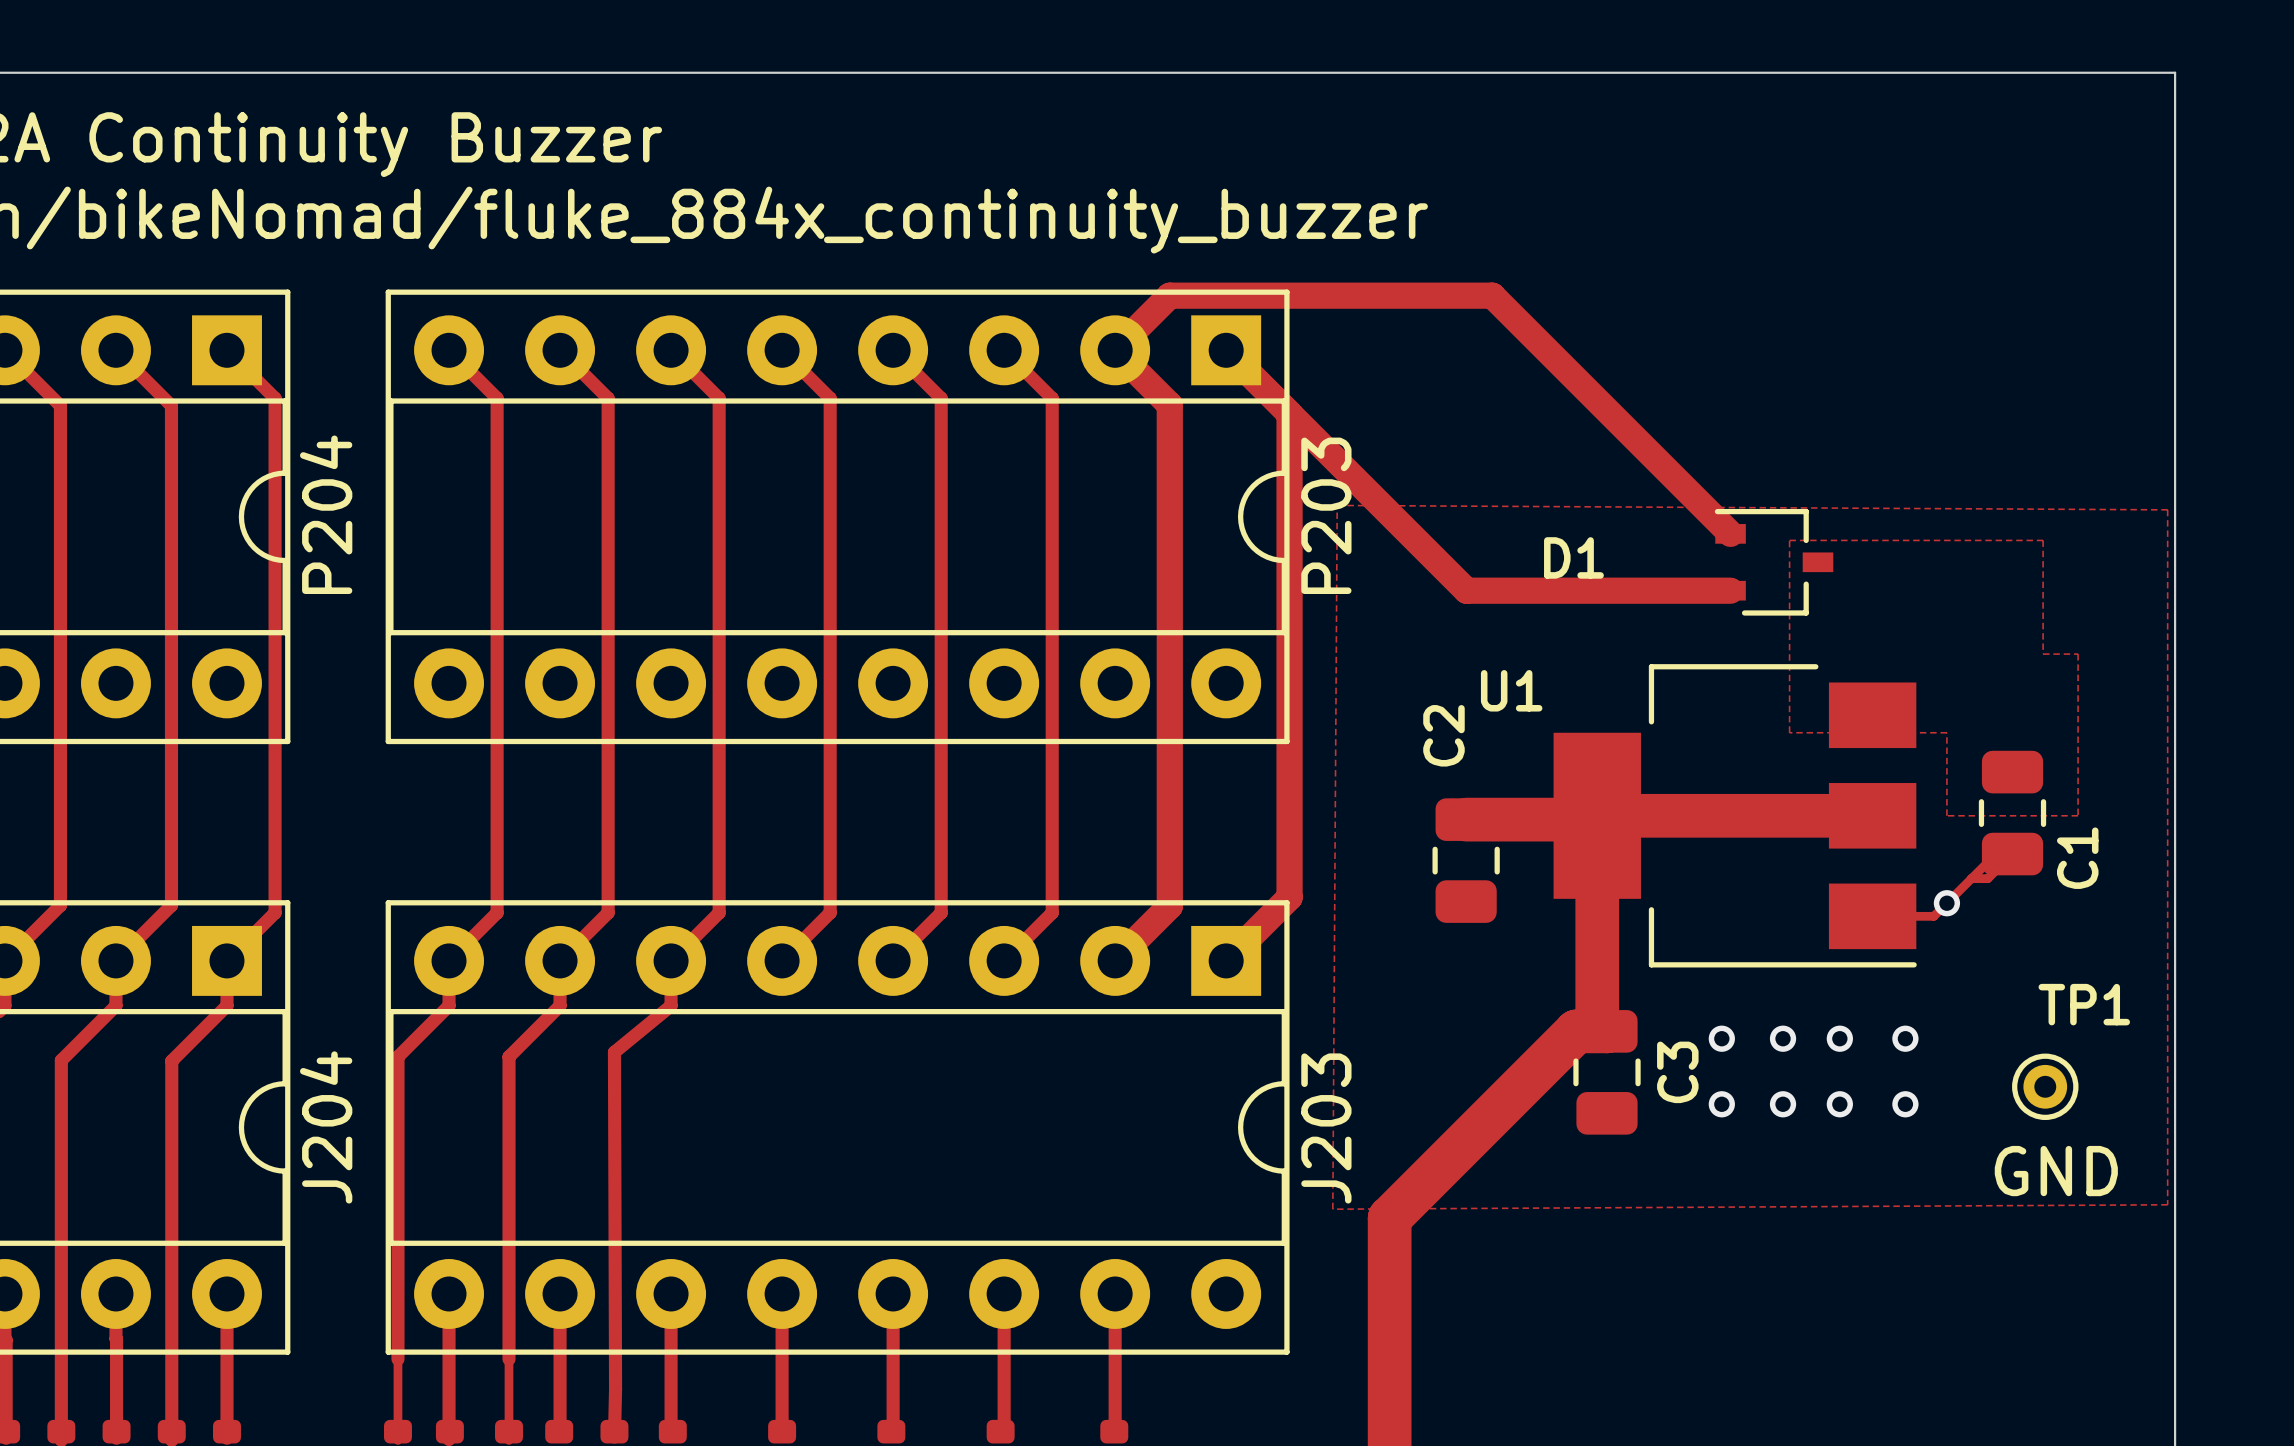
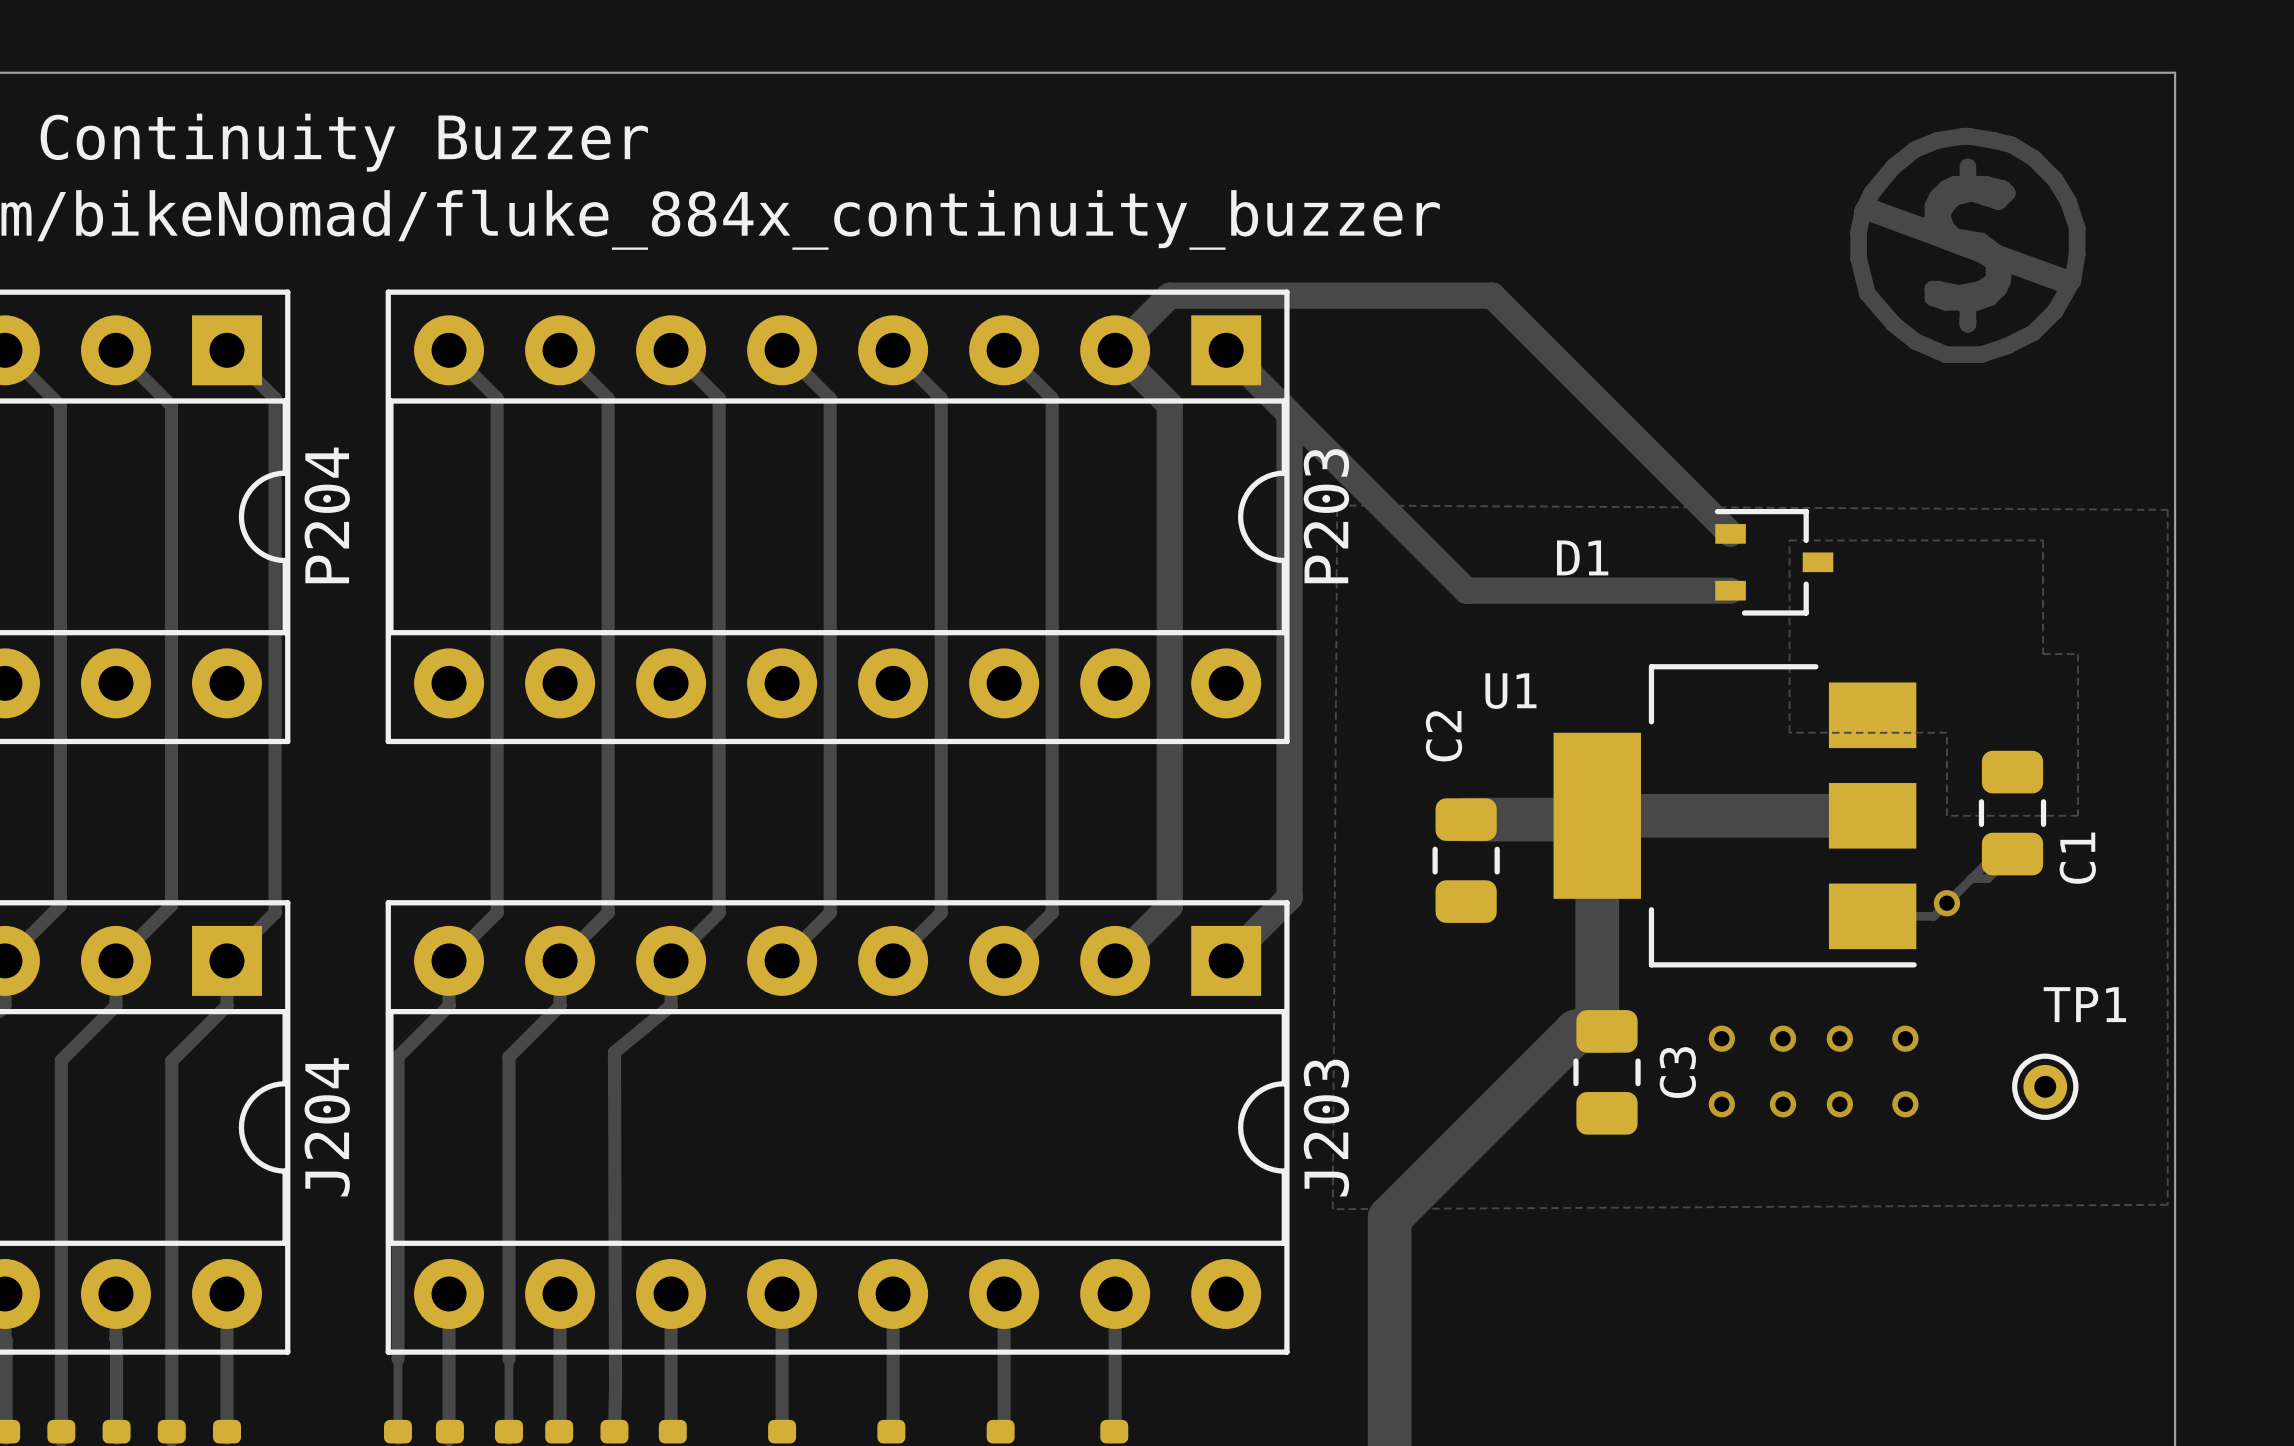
drawing: none -> [1850, 127, 2086, 363]
text: GND (2056, 1171) -> none

